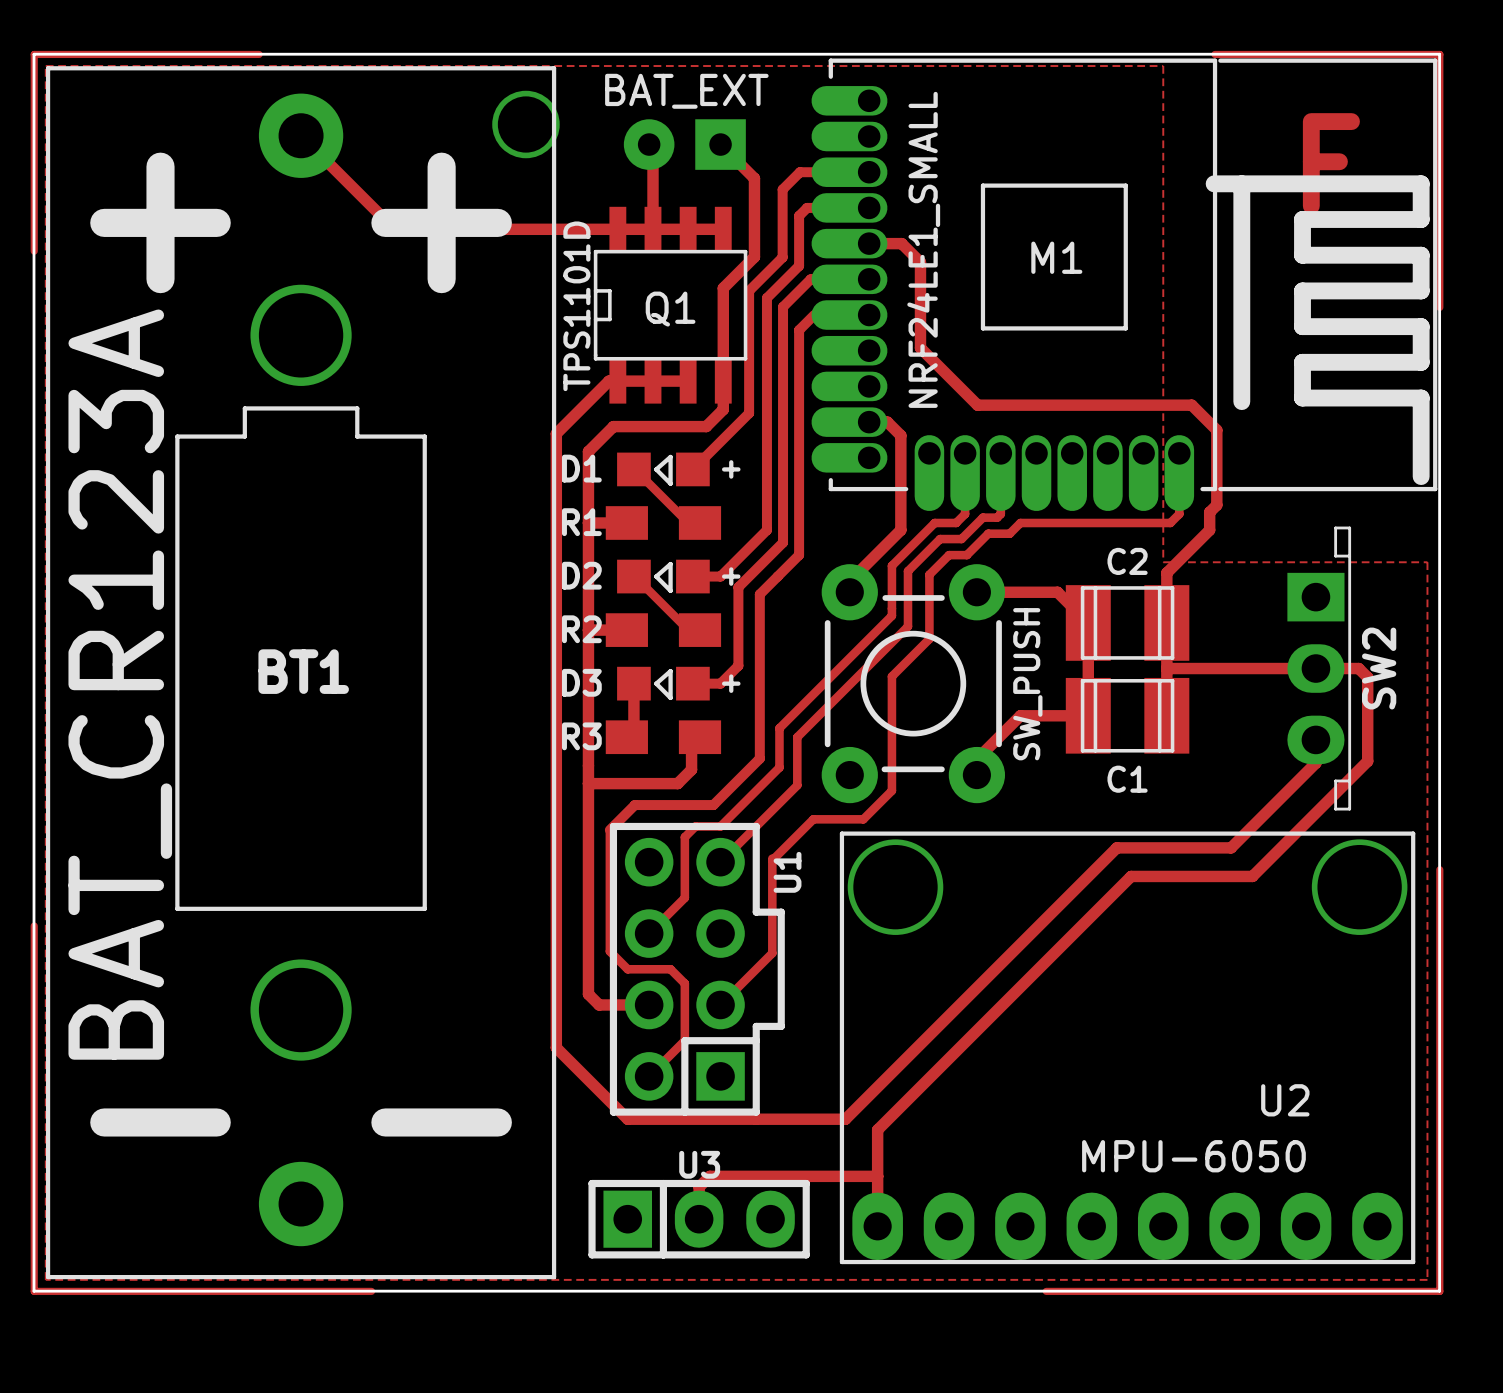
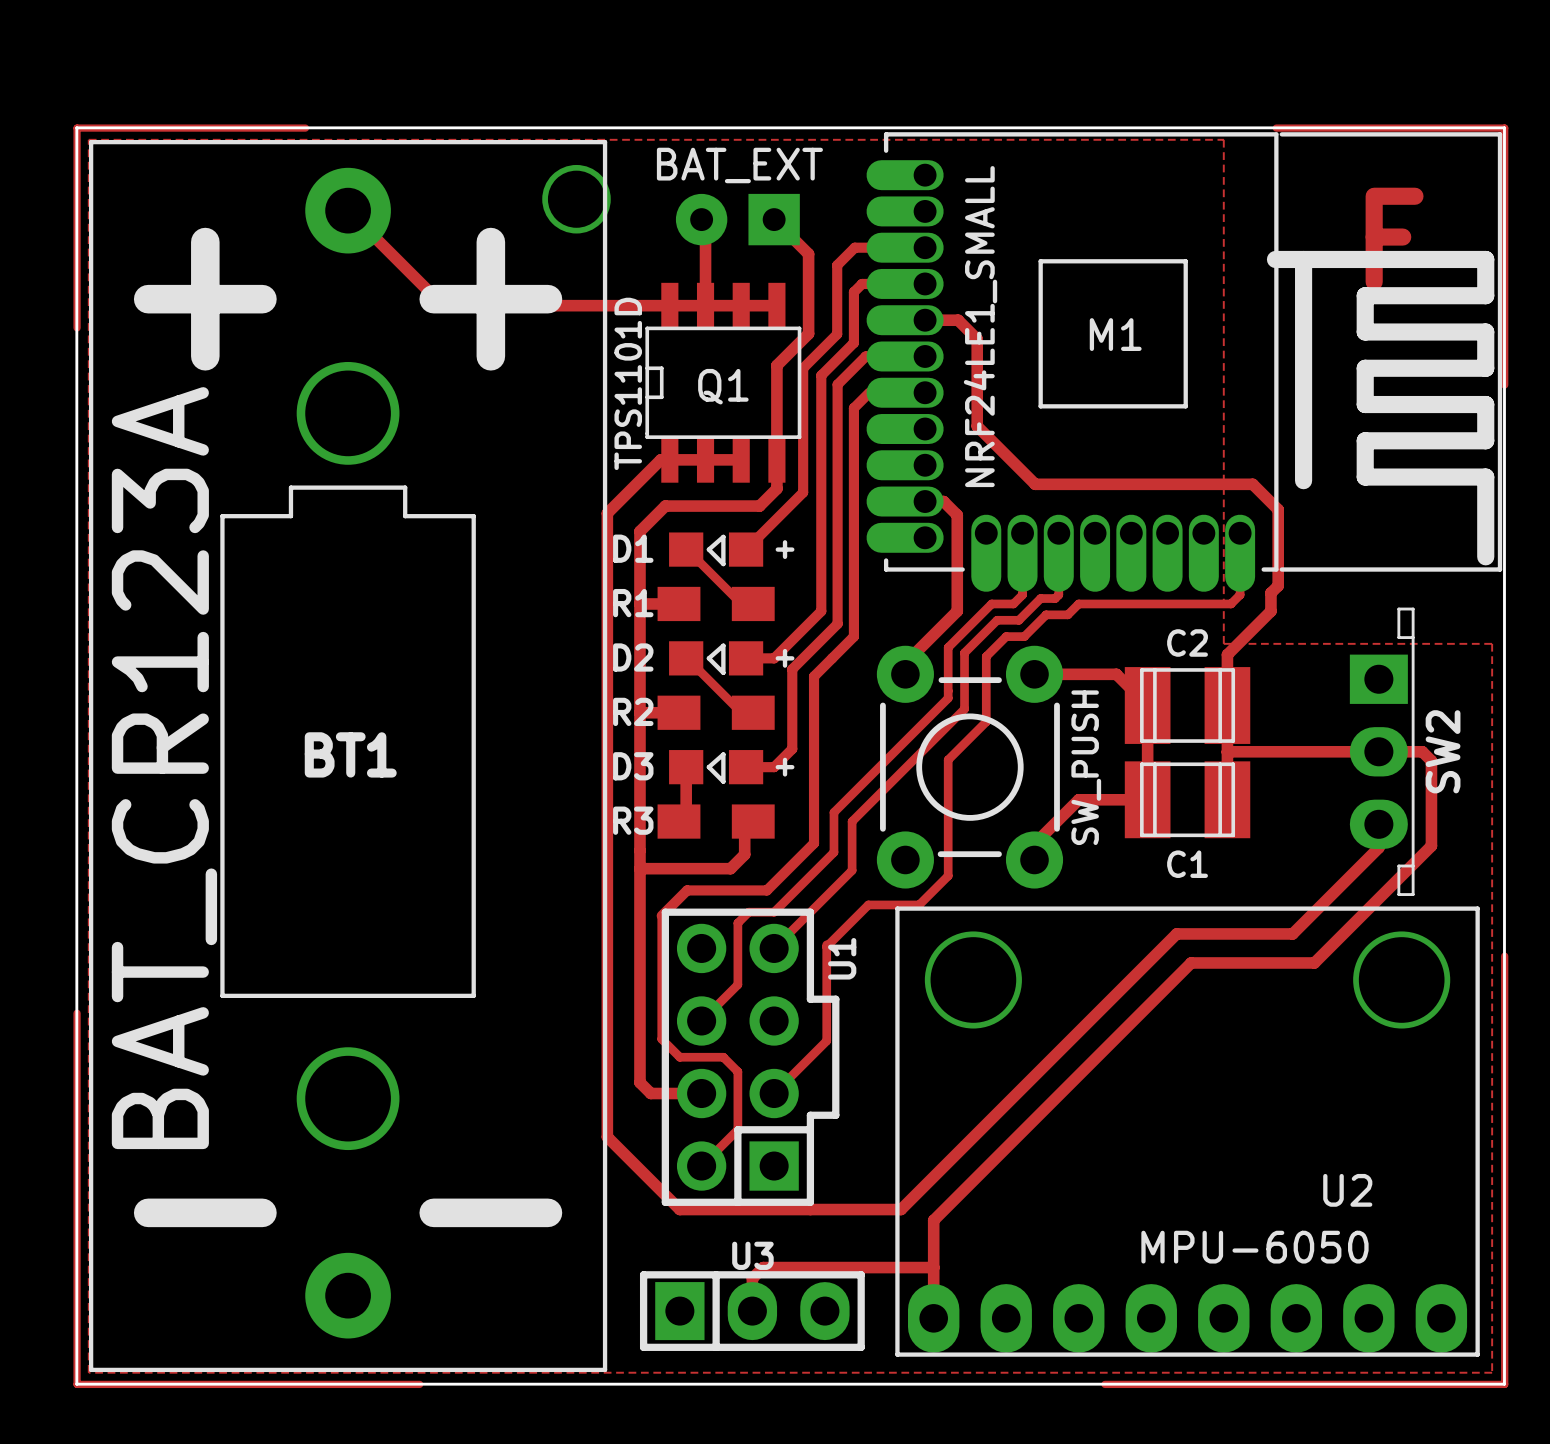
U2 footprint: [839, 831, 1416, 1265] -> [895, 906, 1480, 1357]

